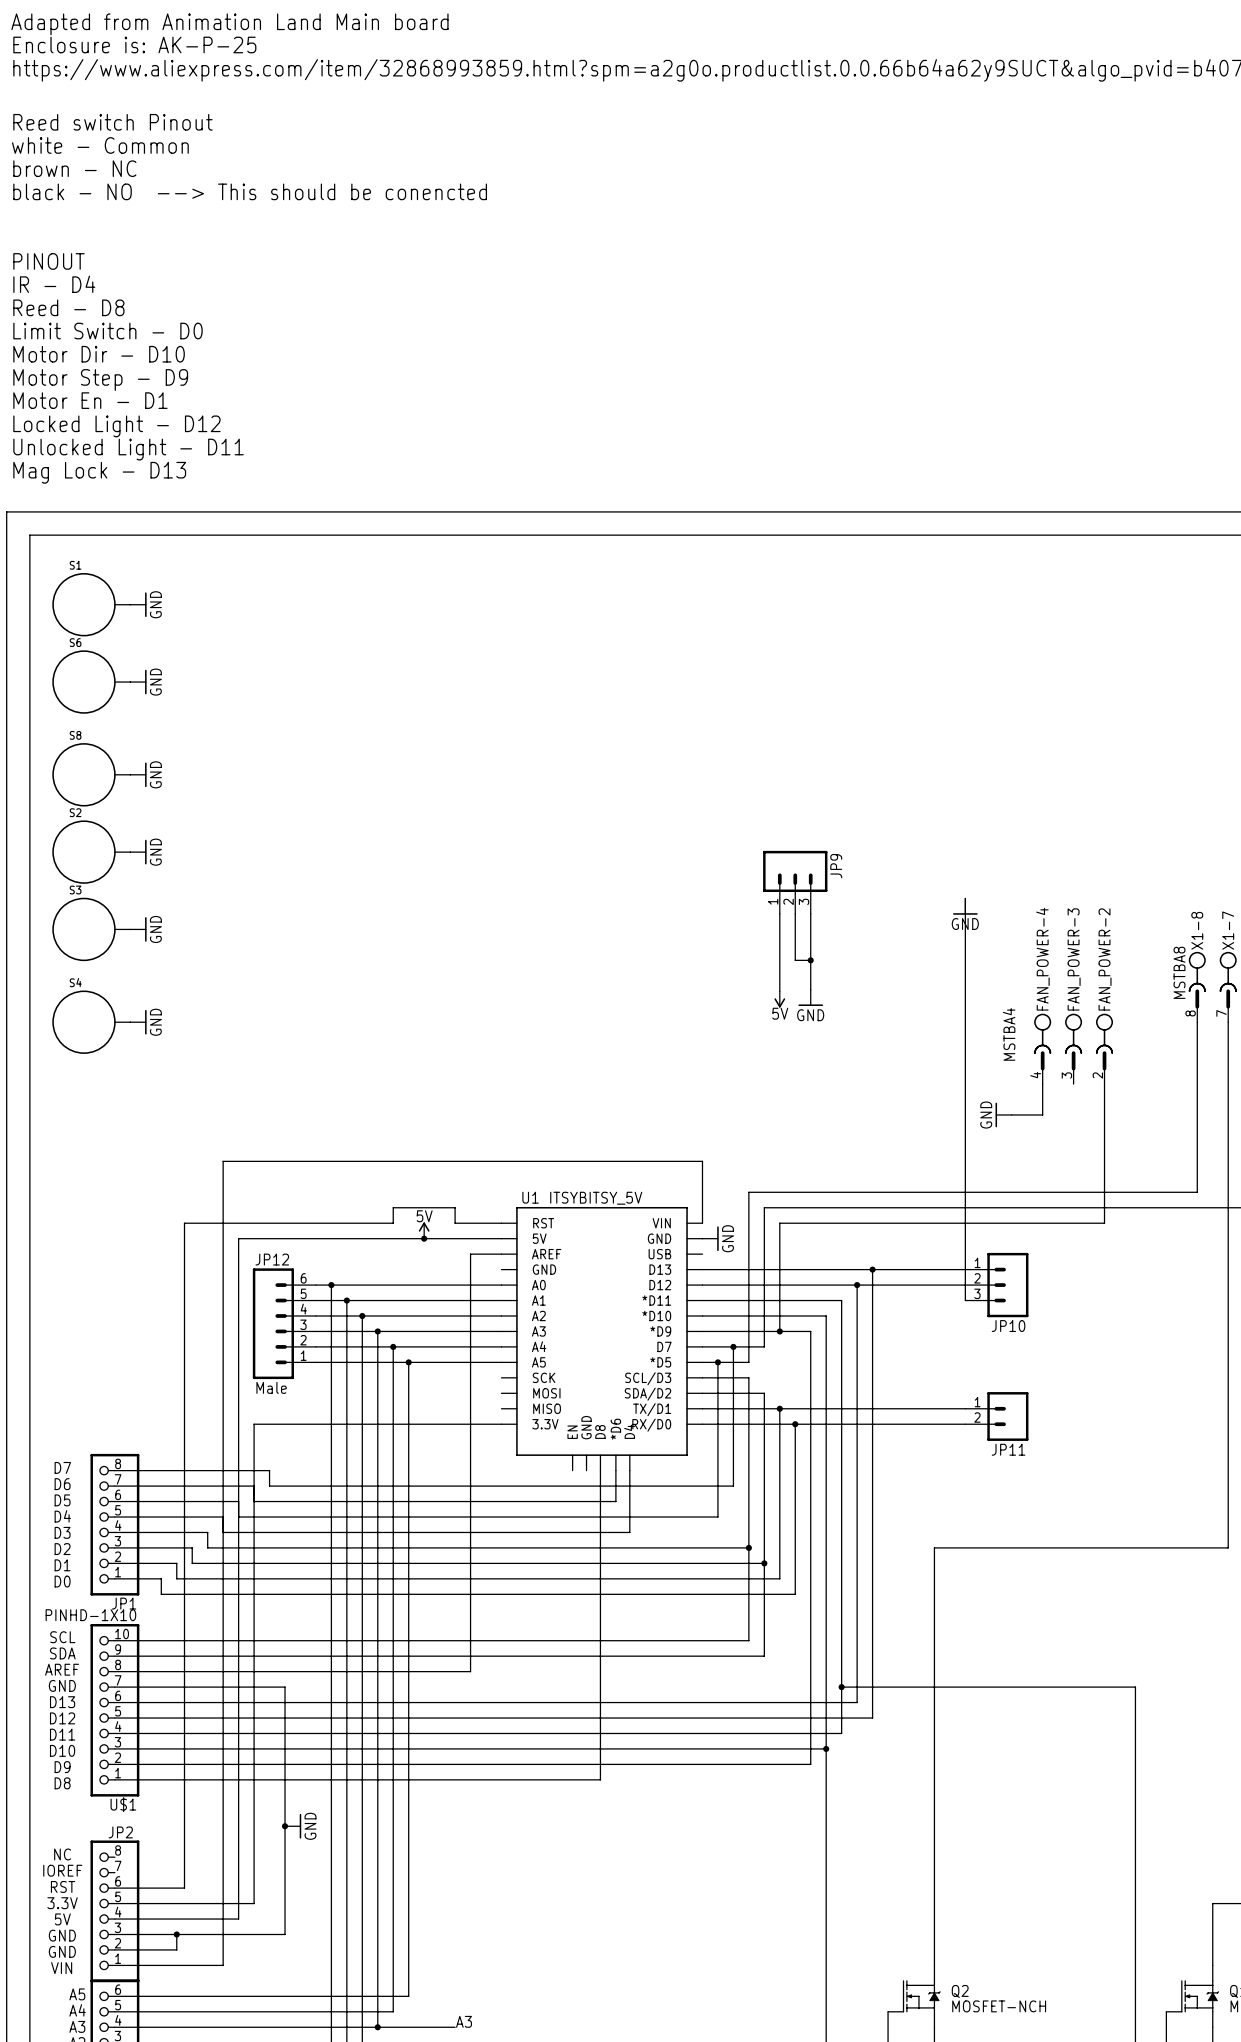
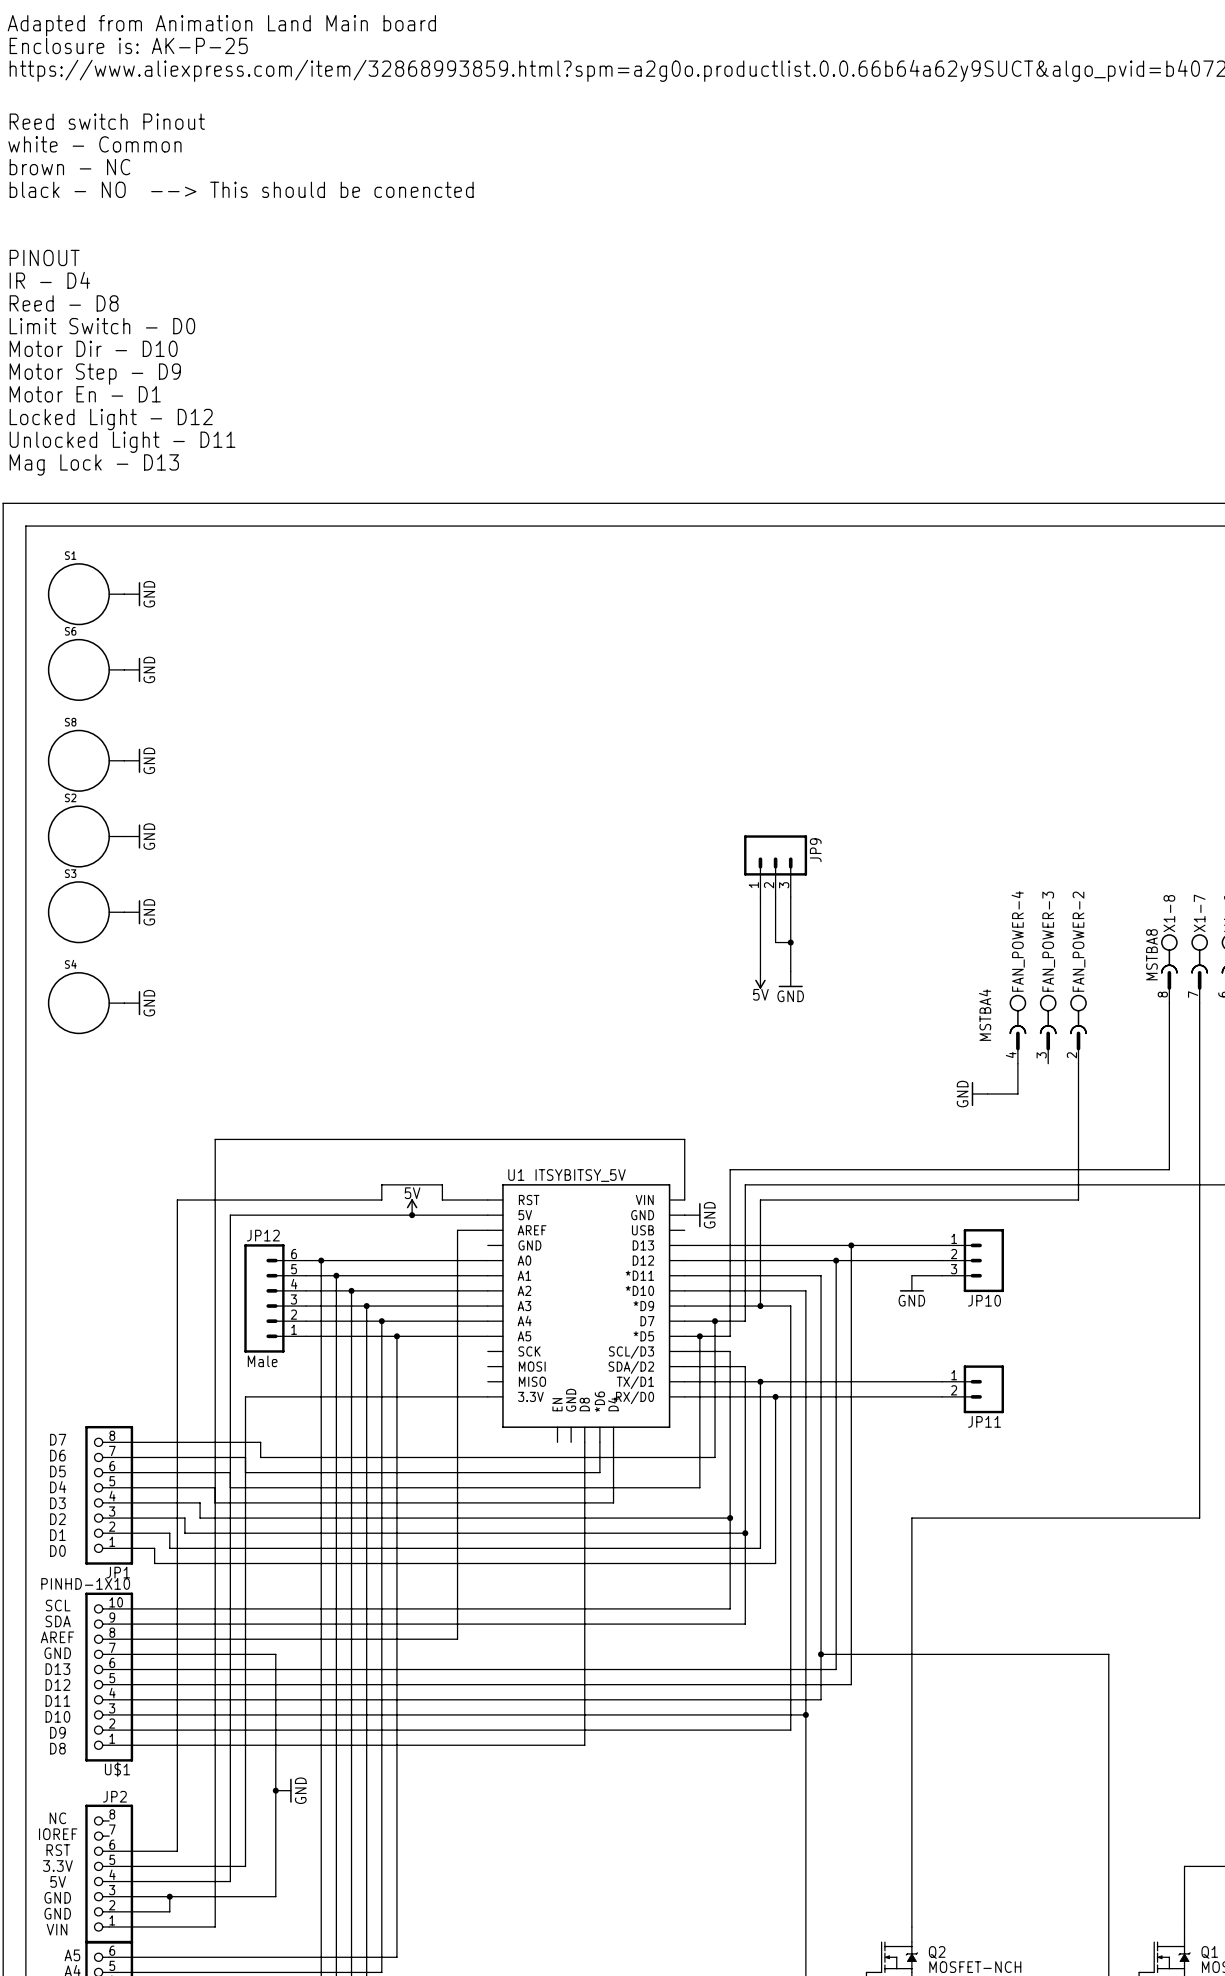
wire: (965, 898) (965, 1300) -> (911, 1275) (942, 1275)
power symbol: GND (965, 906) -> none
power symbol: none -> GND (911, 1283)

